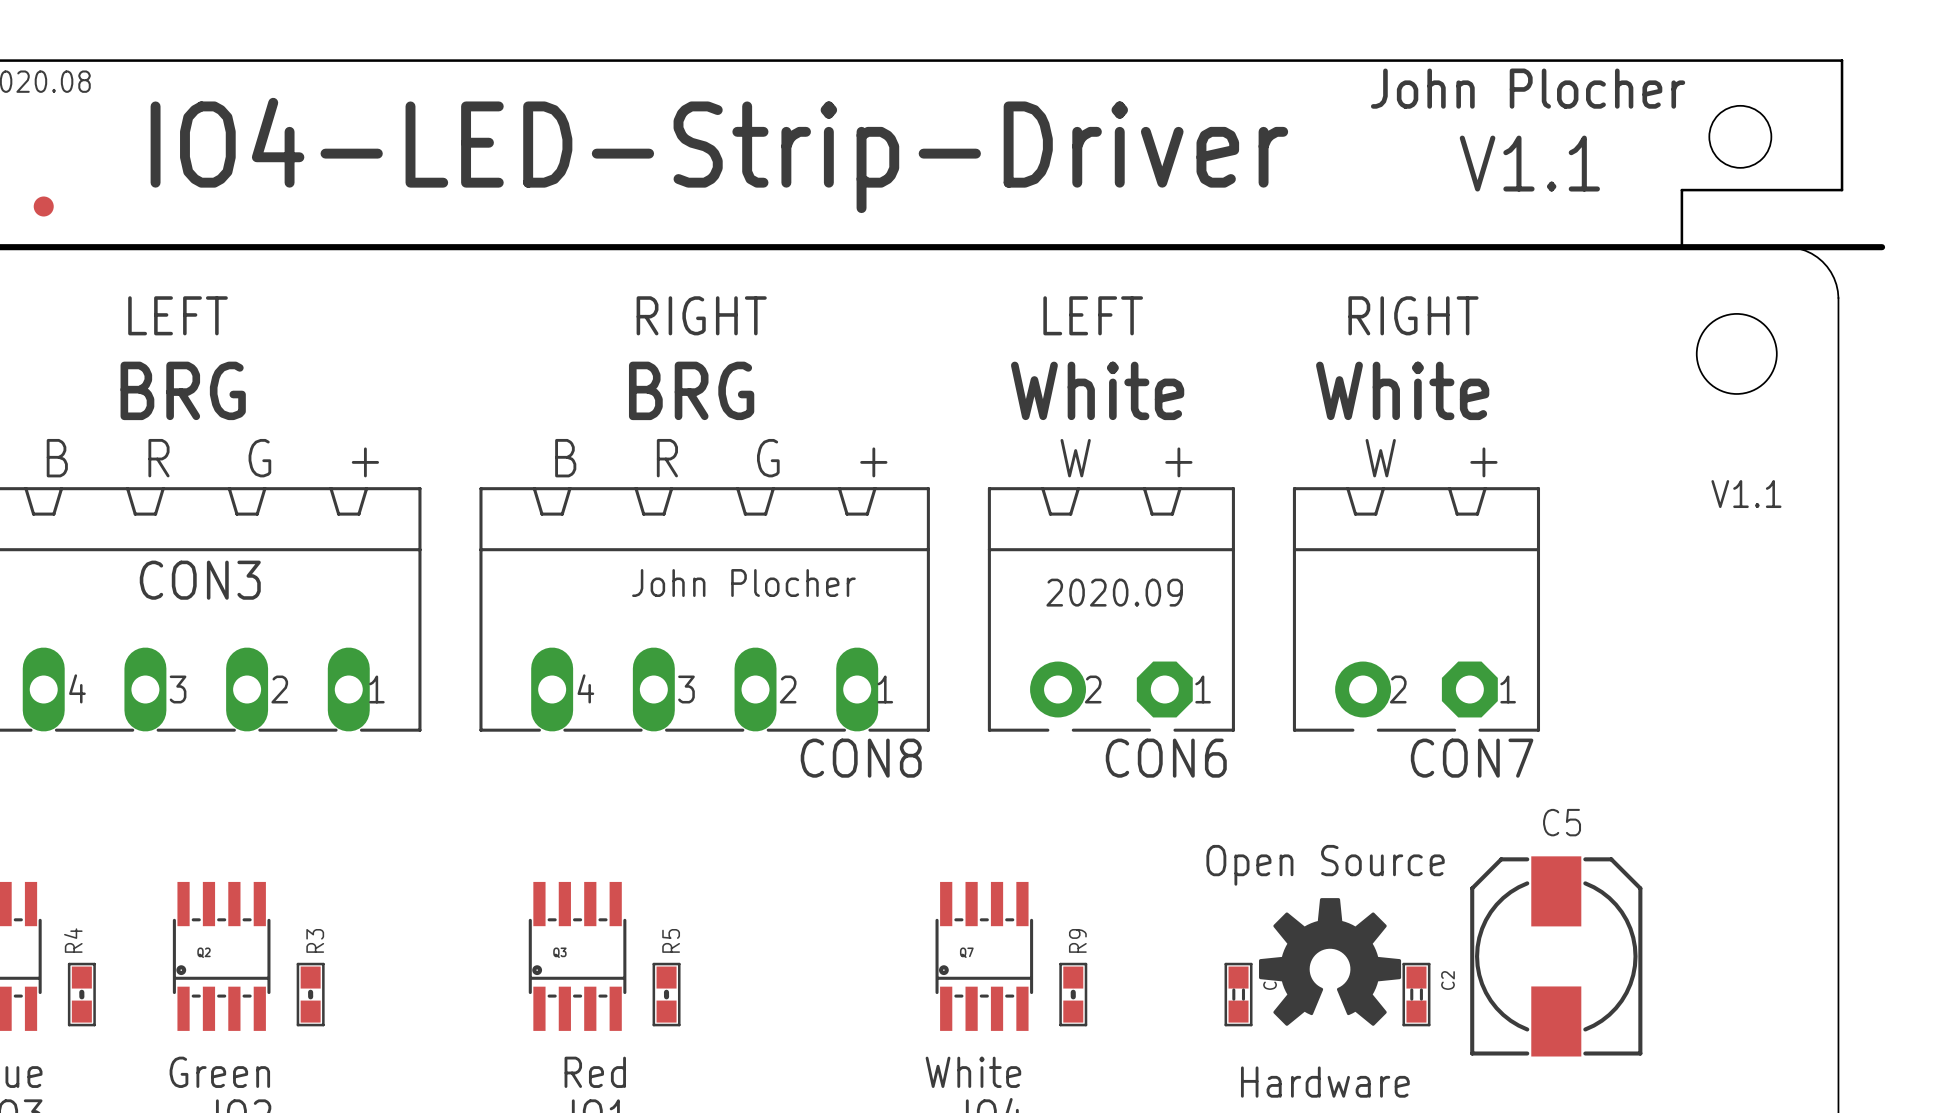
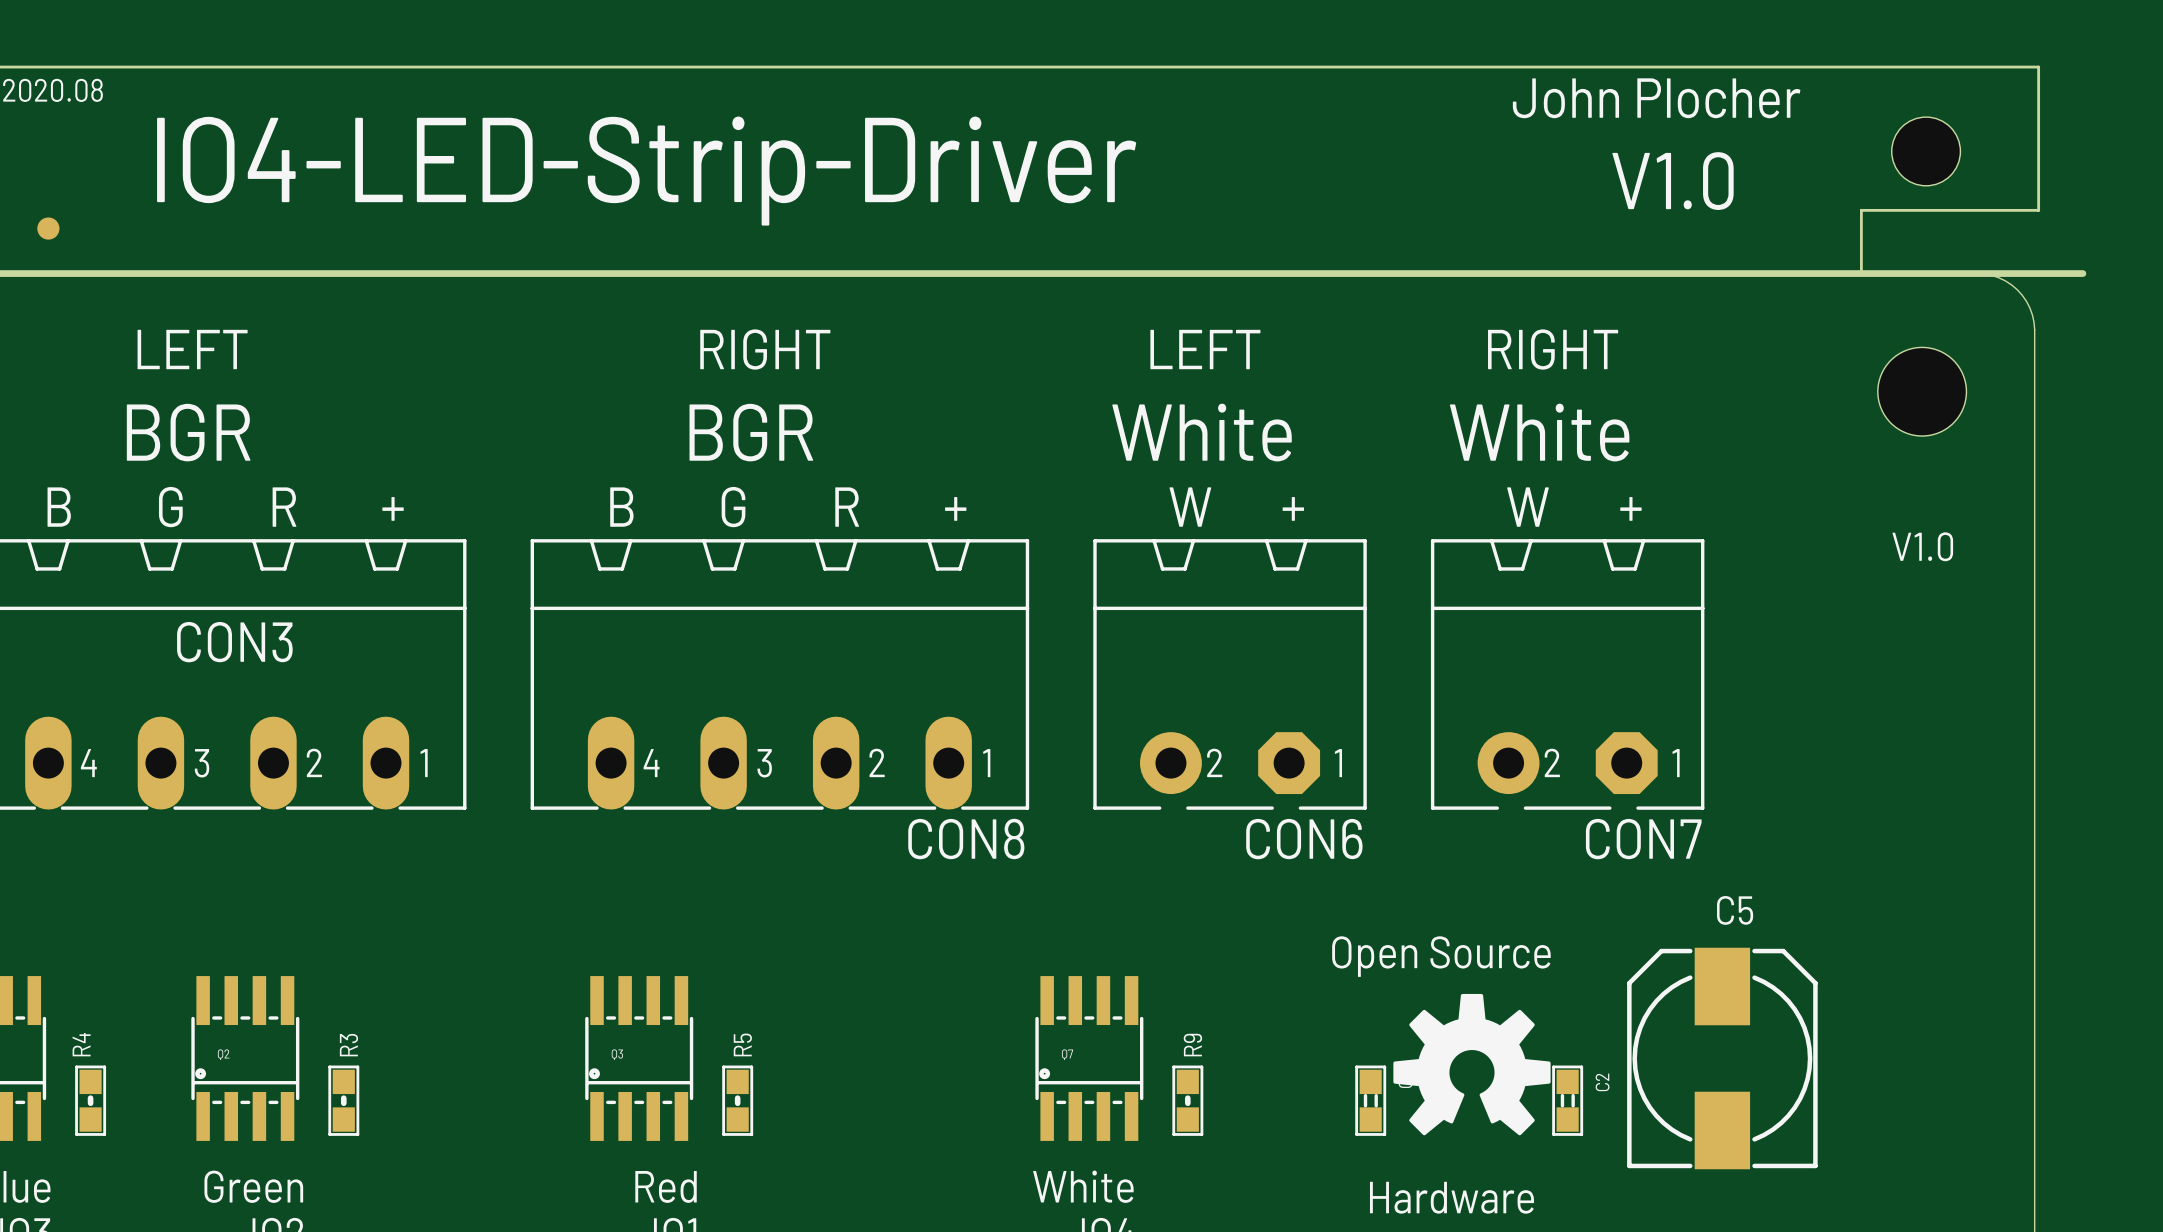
text: V1.1 (1529, 163) -> V1.0 (1673, 181)
text: BRG (183, 390) -> BGR (188, 432)
text: BRG (691, 390) -> BGR (751, 432)
text: R (158, 458) -> G (170, 507)
text: G (259, 458) -> R (284, 507)
text: R (667, 458) -> G (733, 507)
text: G (768, 458) -> R (847, 507)
text: V1.1 (1746, 494) -> V1.0 (1922, 546)
text: John Plocher (743, 583) -> none
text: 2020.09 (1114, 592) -> none

